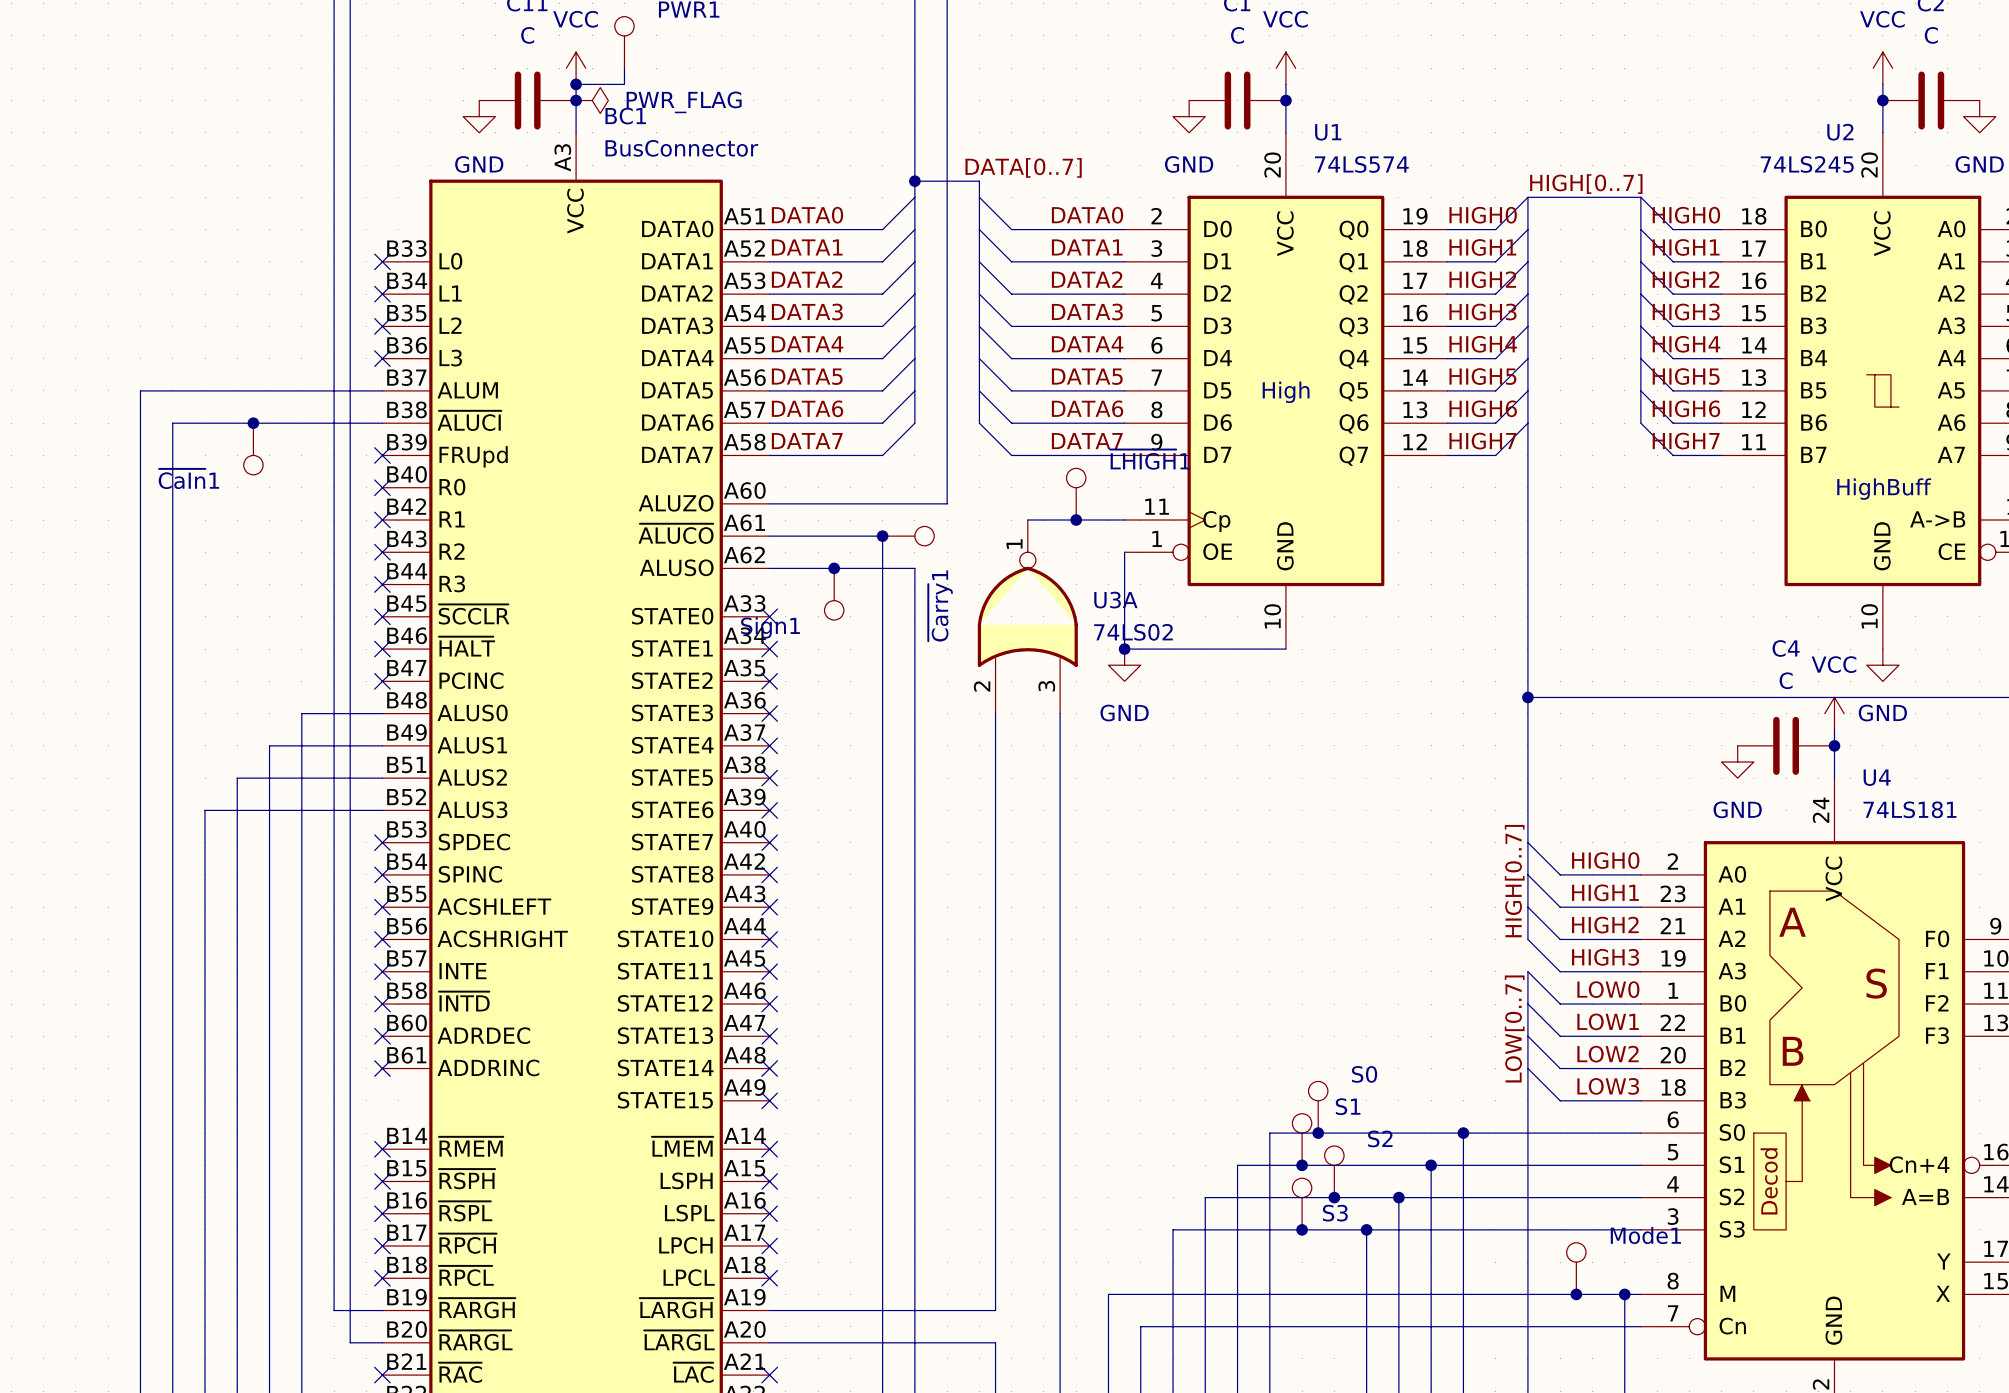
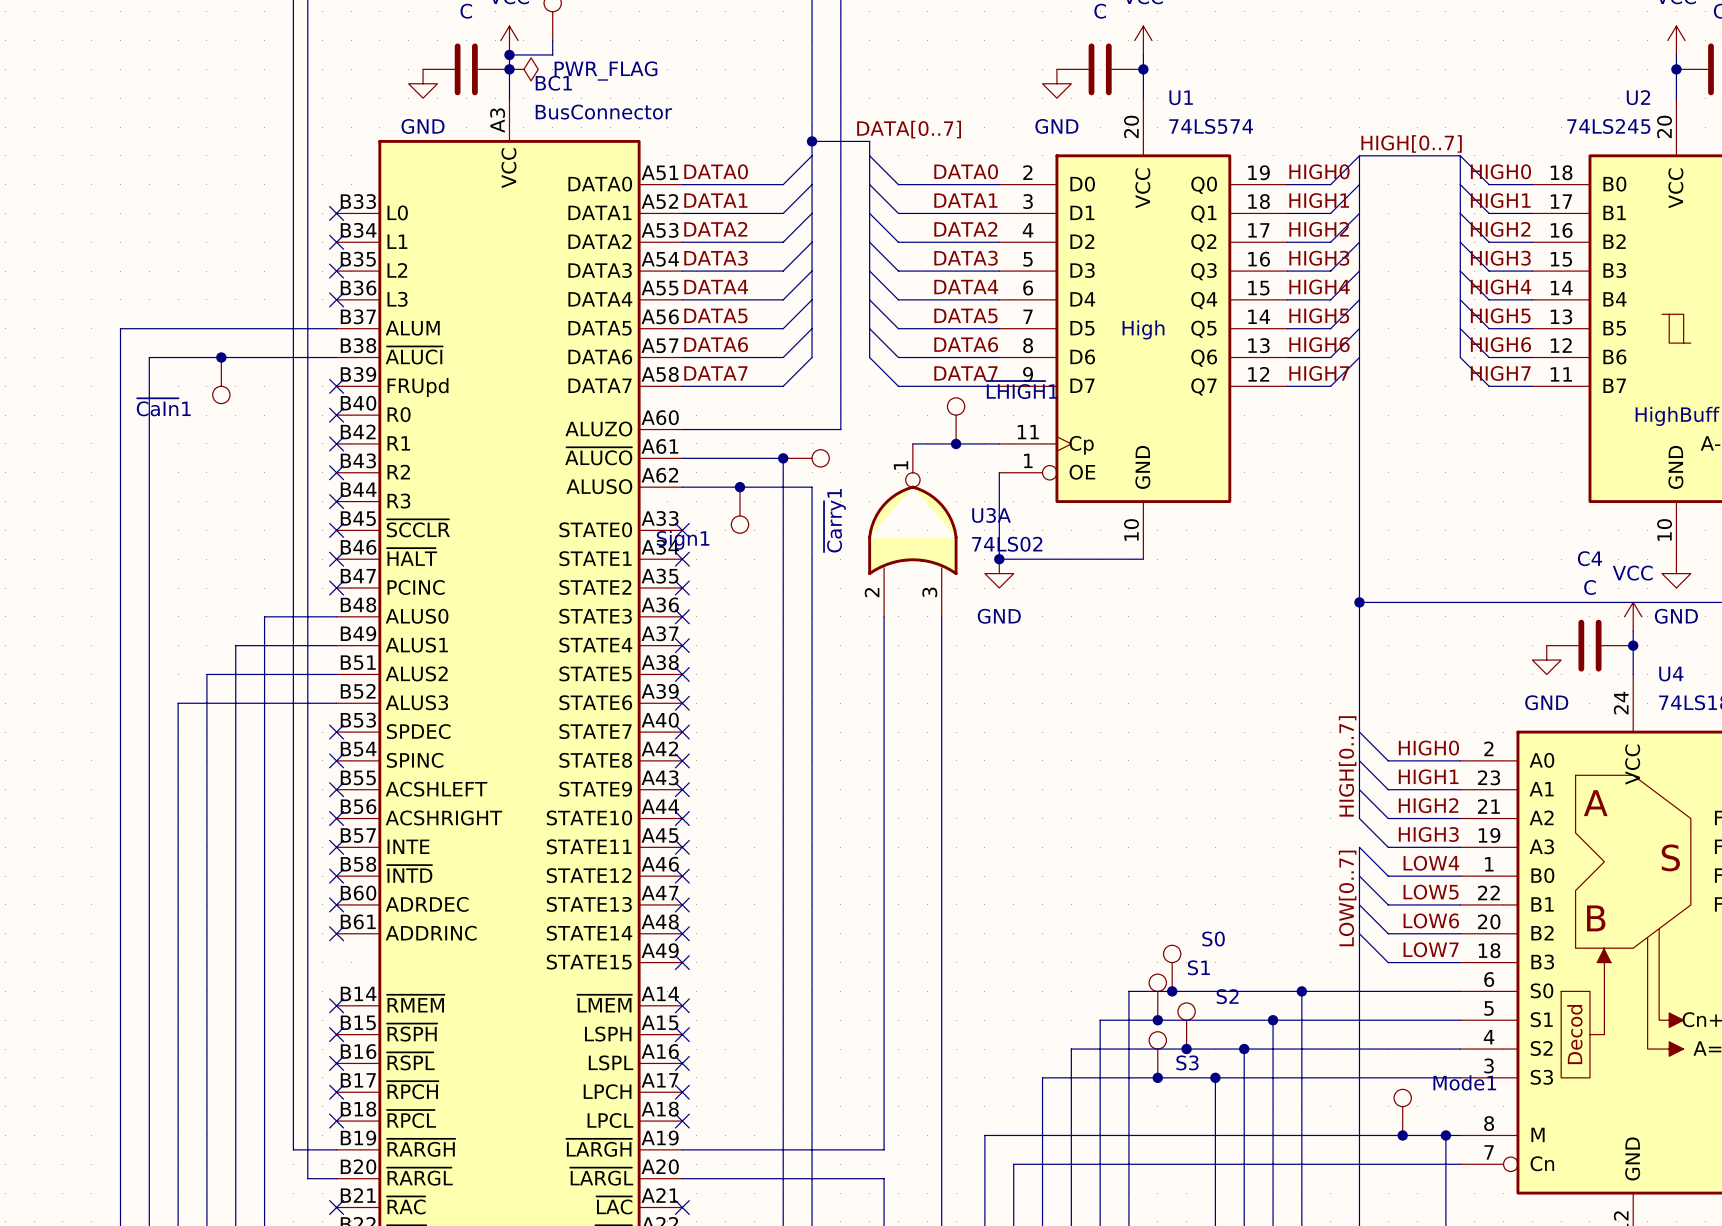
label: LOW0 (1608, 989) -> LOW4 (1431, 863)
label: LOW1 (1608, 1021) -> LOW5 (1431, 892)
label: LOW2 (1608, 1054) -> LOW6 (1431, 920)
label: LOW3 (1608, 1086) -> LOW7 (1431, 949)

